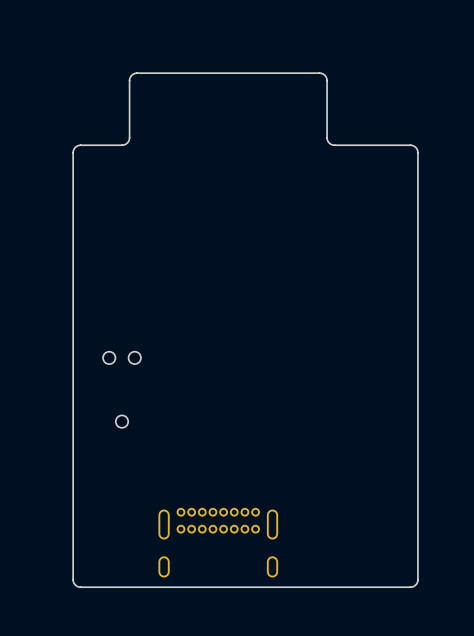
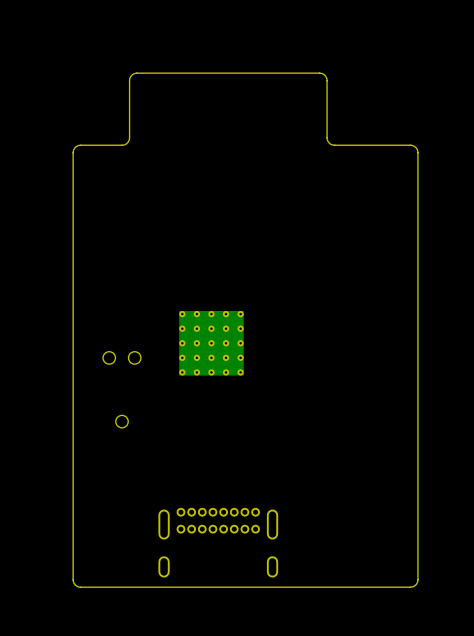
part: none -> (211, 343)

